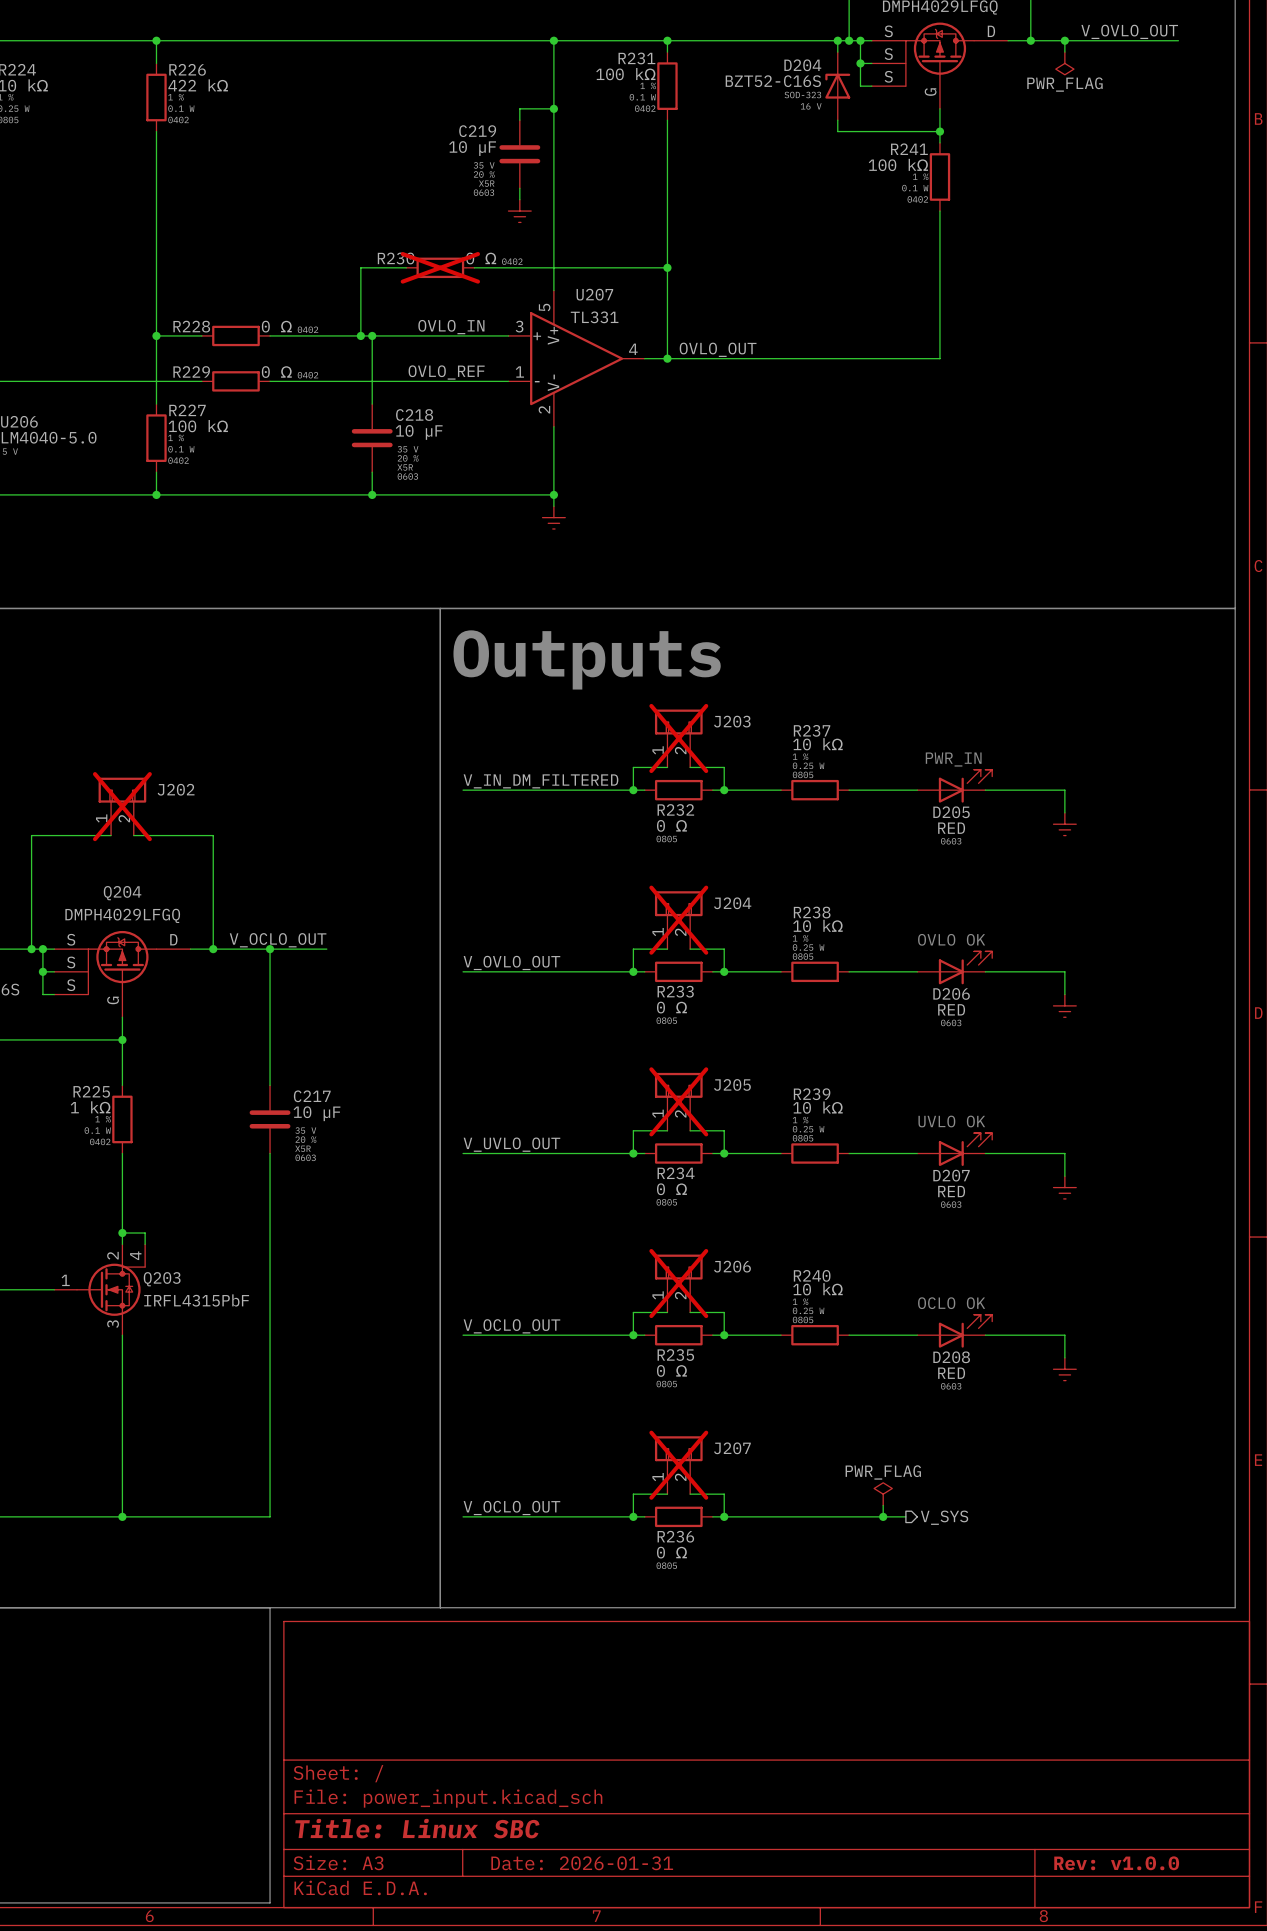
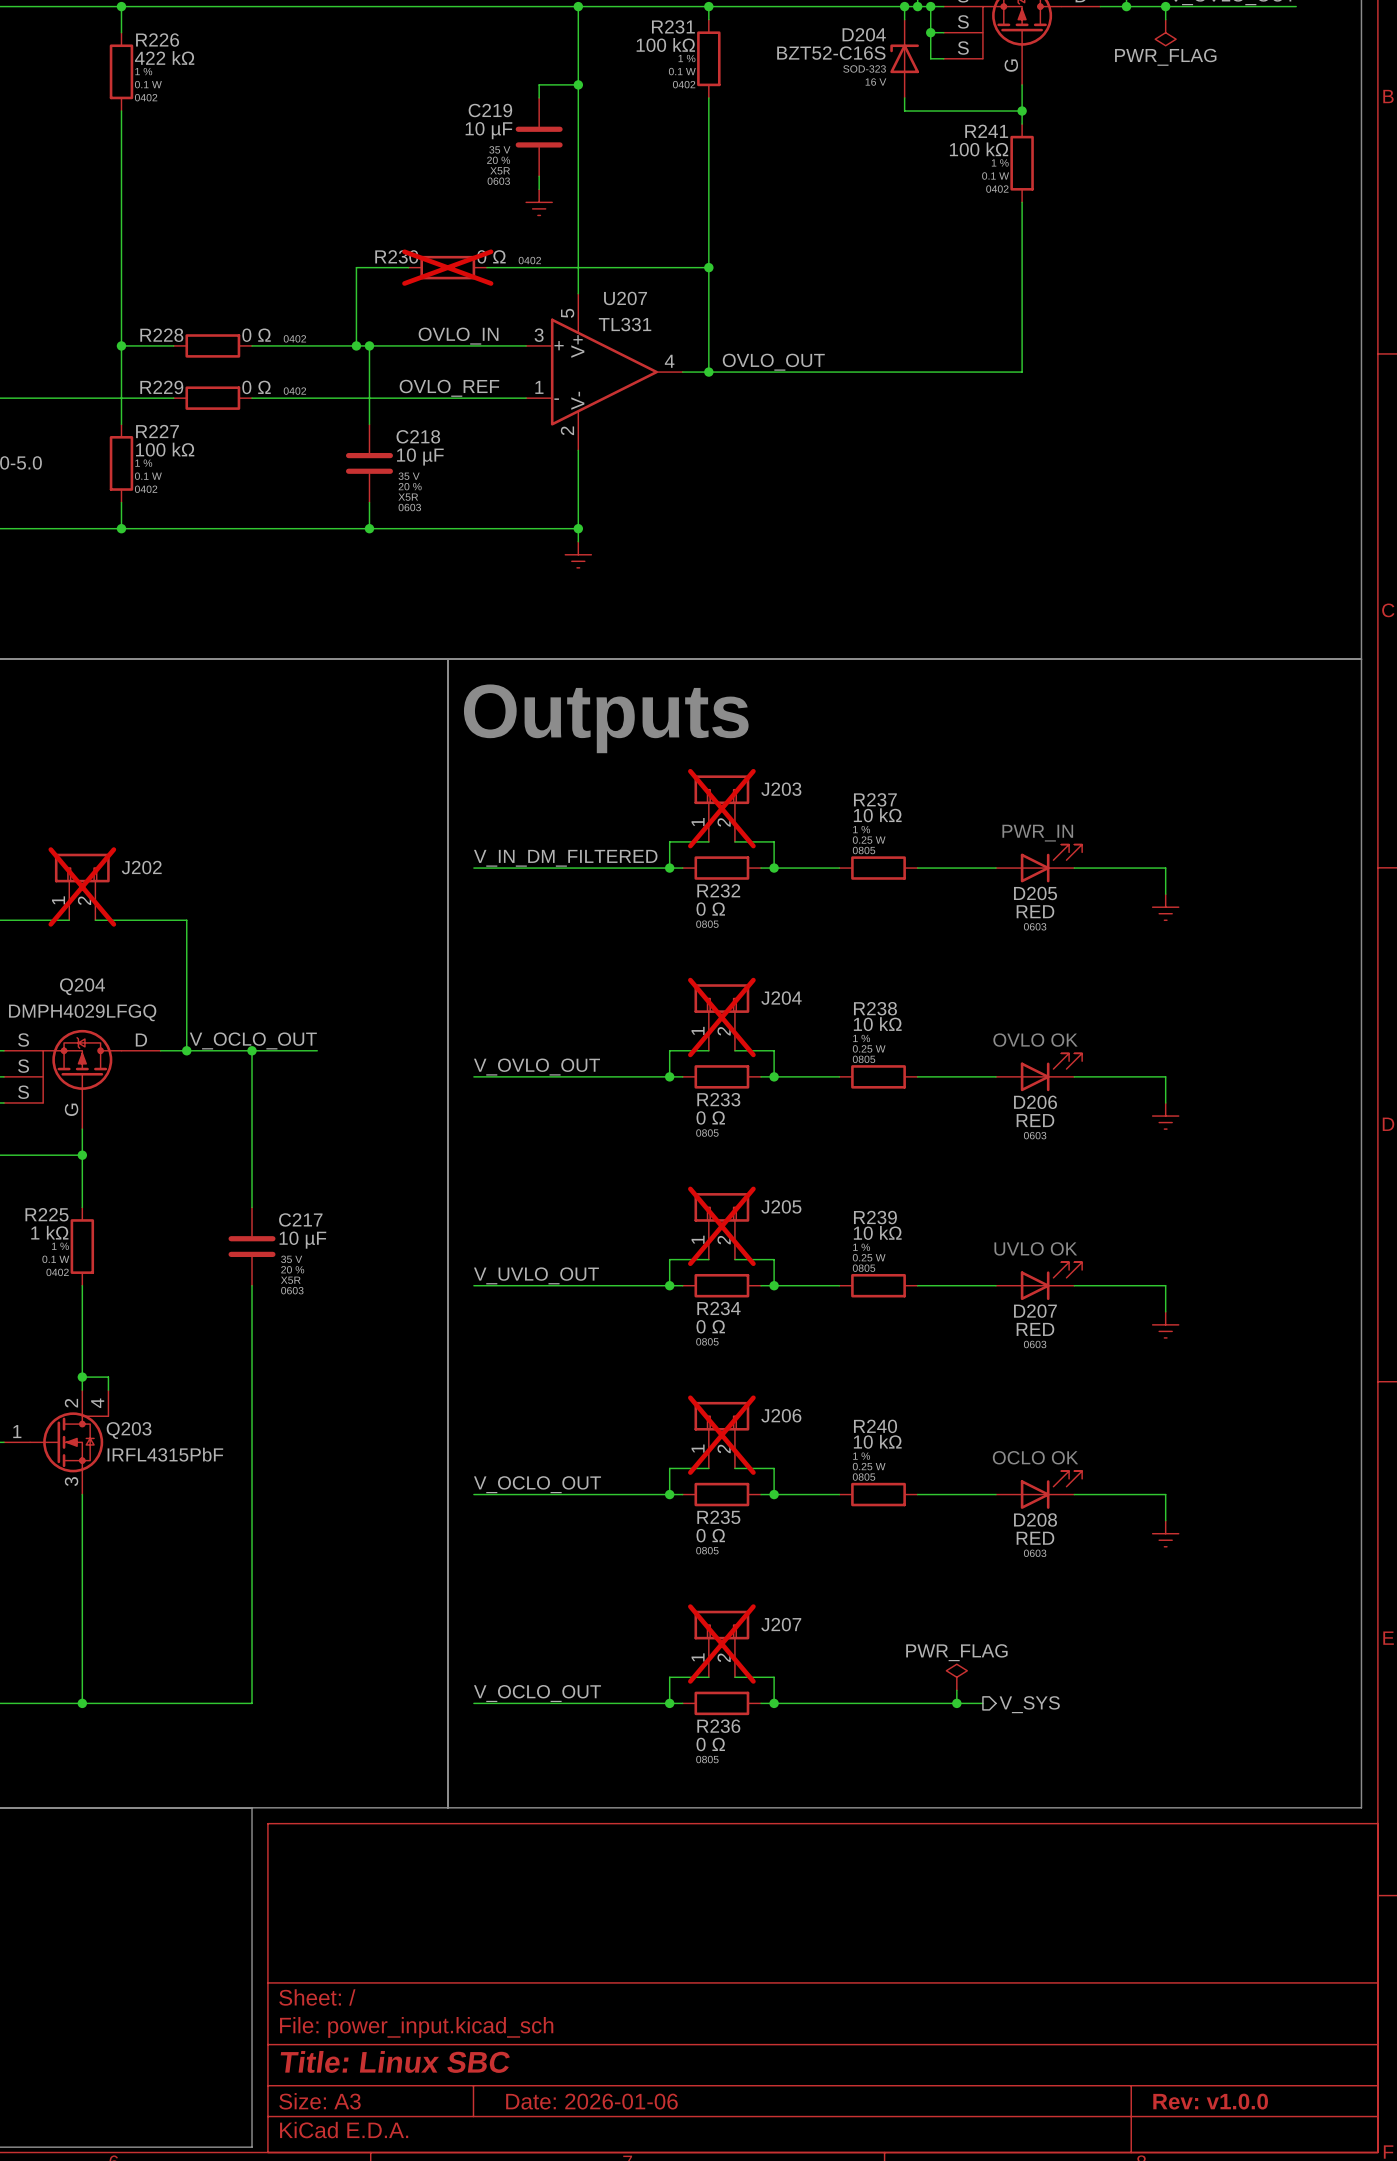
title block: Date: 2026-01-31 (582, 1863) -> Date: 2026-01-06 (591, 2101)

